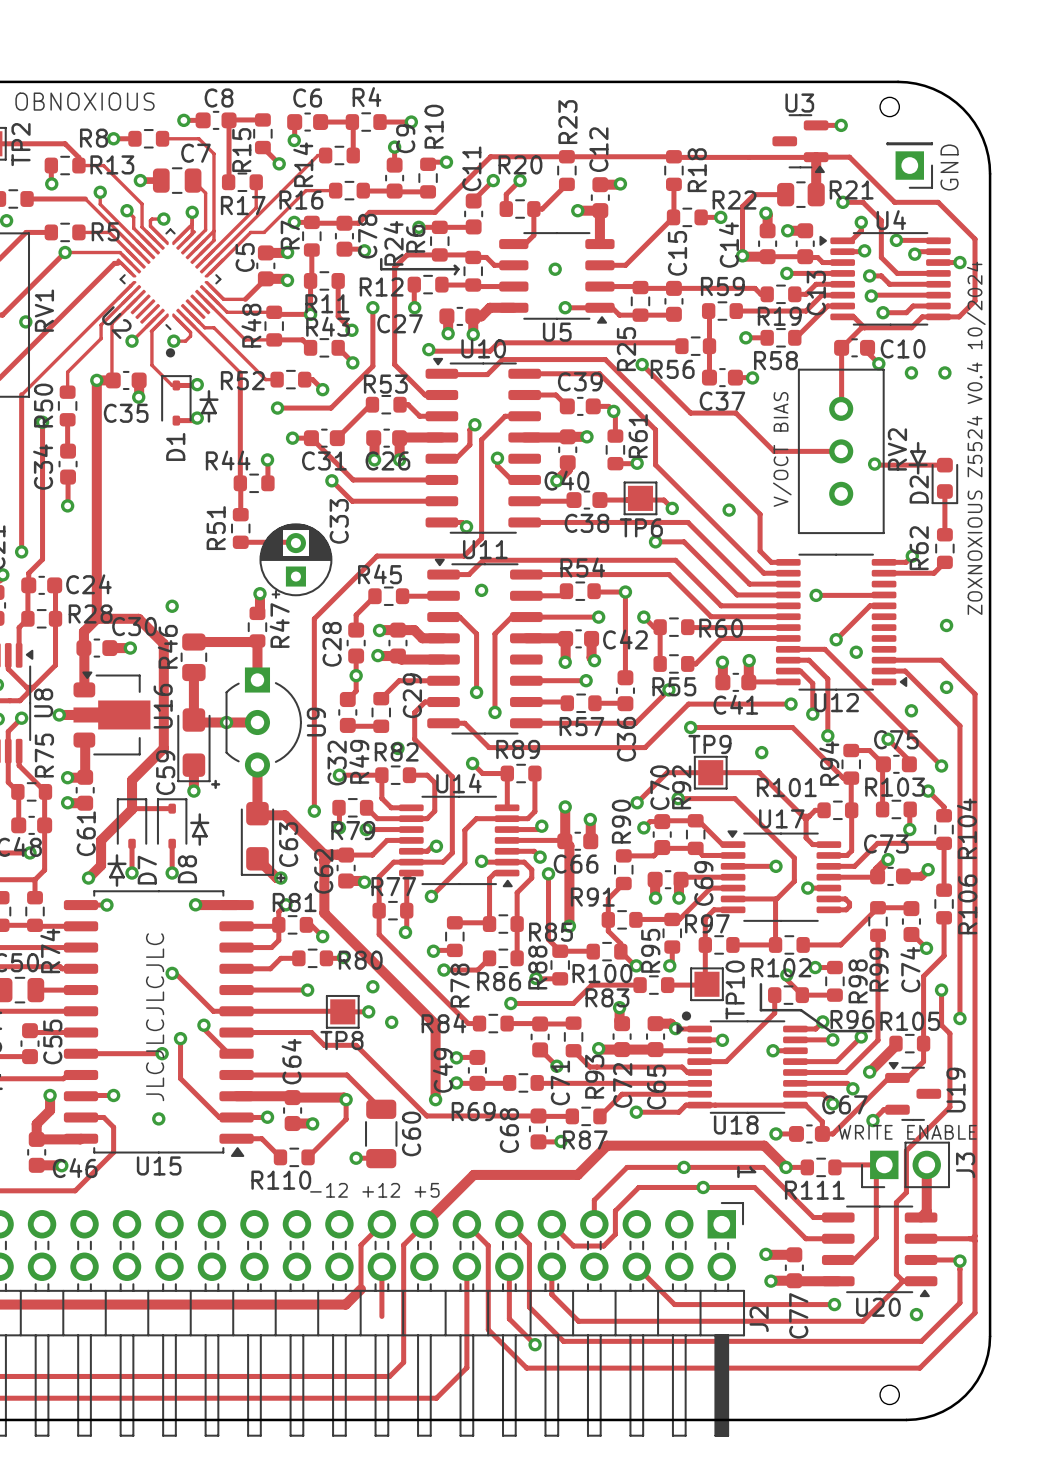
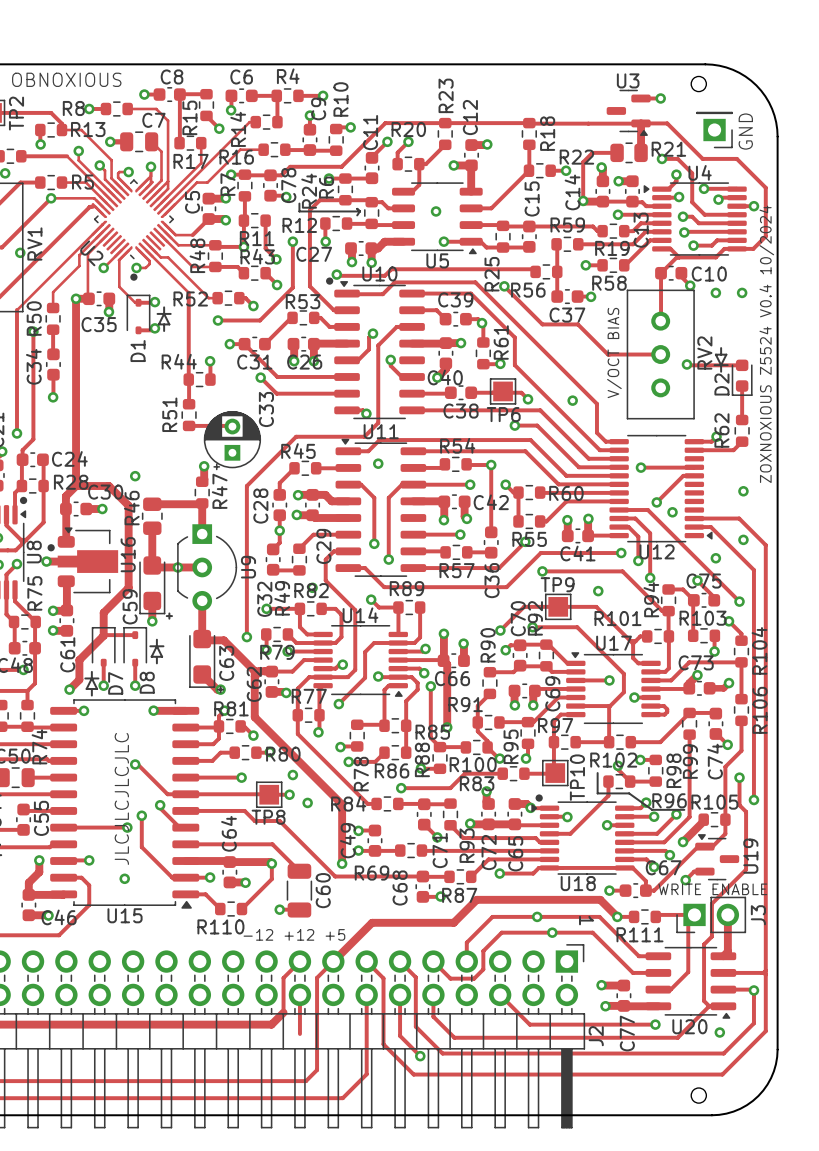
drawing: none -> [326, 277, 334, 285]
drawing: none -> [19, 496, 28, 505]
drawing: none -> [47, 544, 55, 552]

